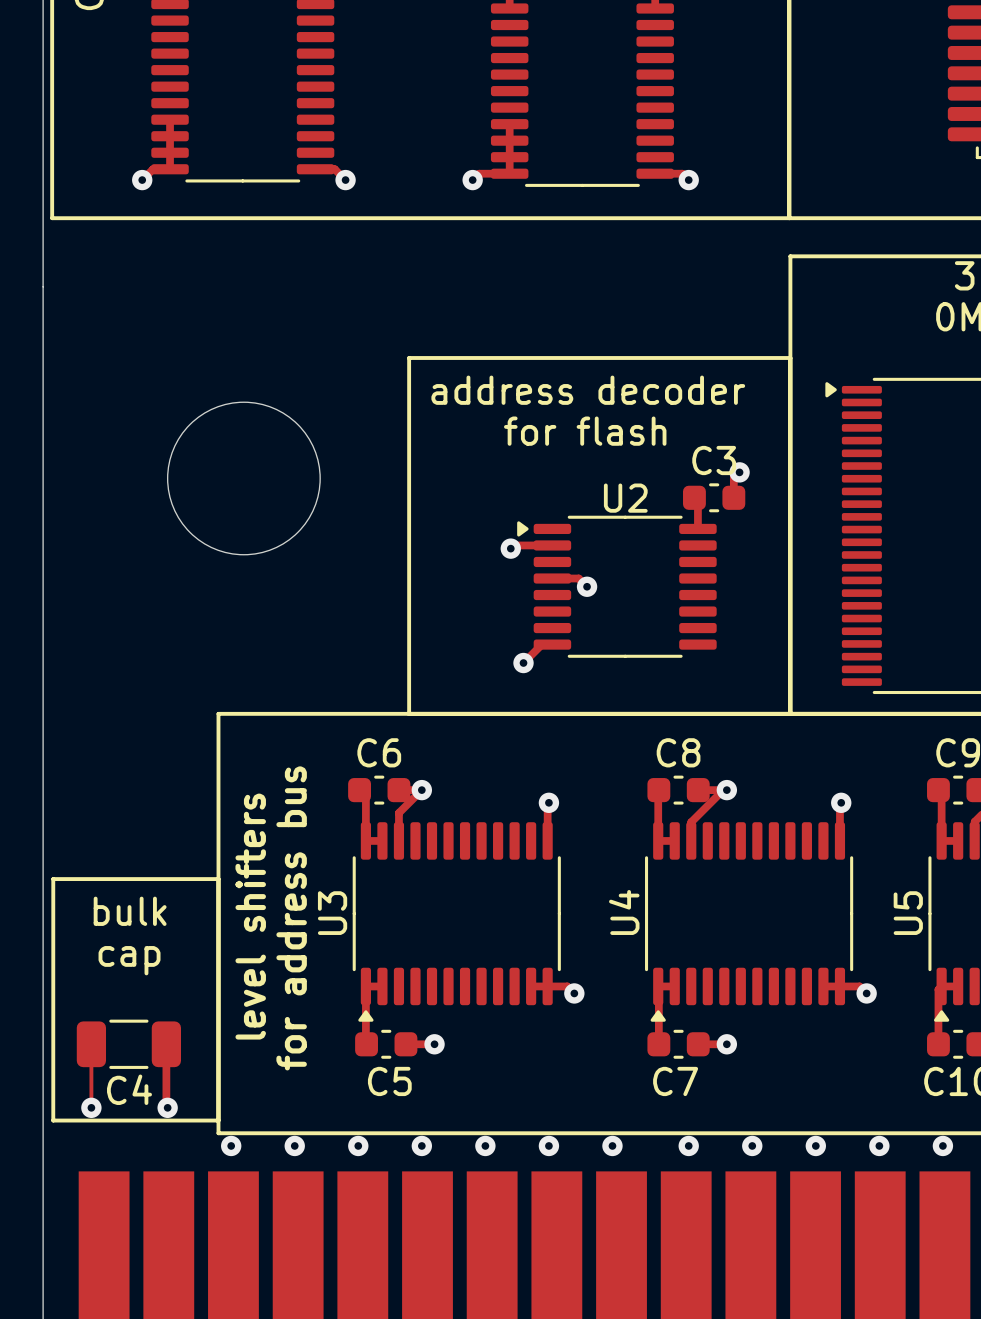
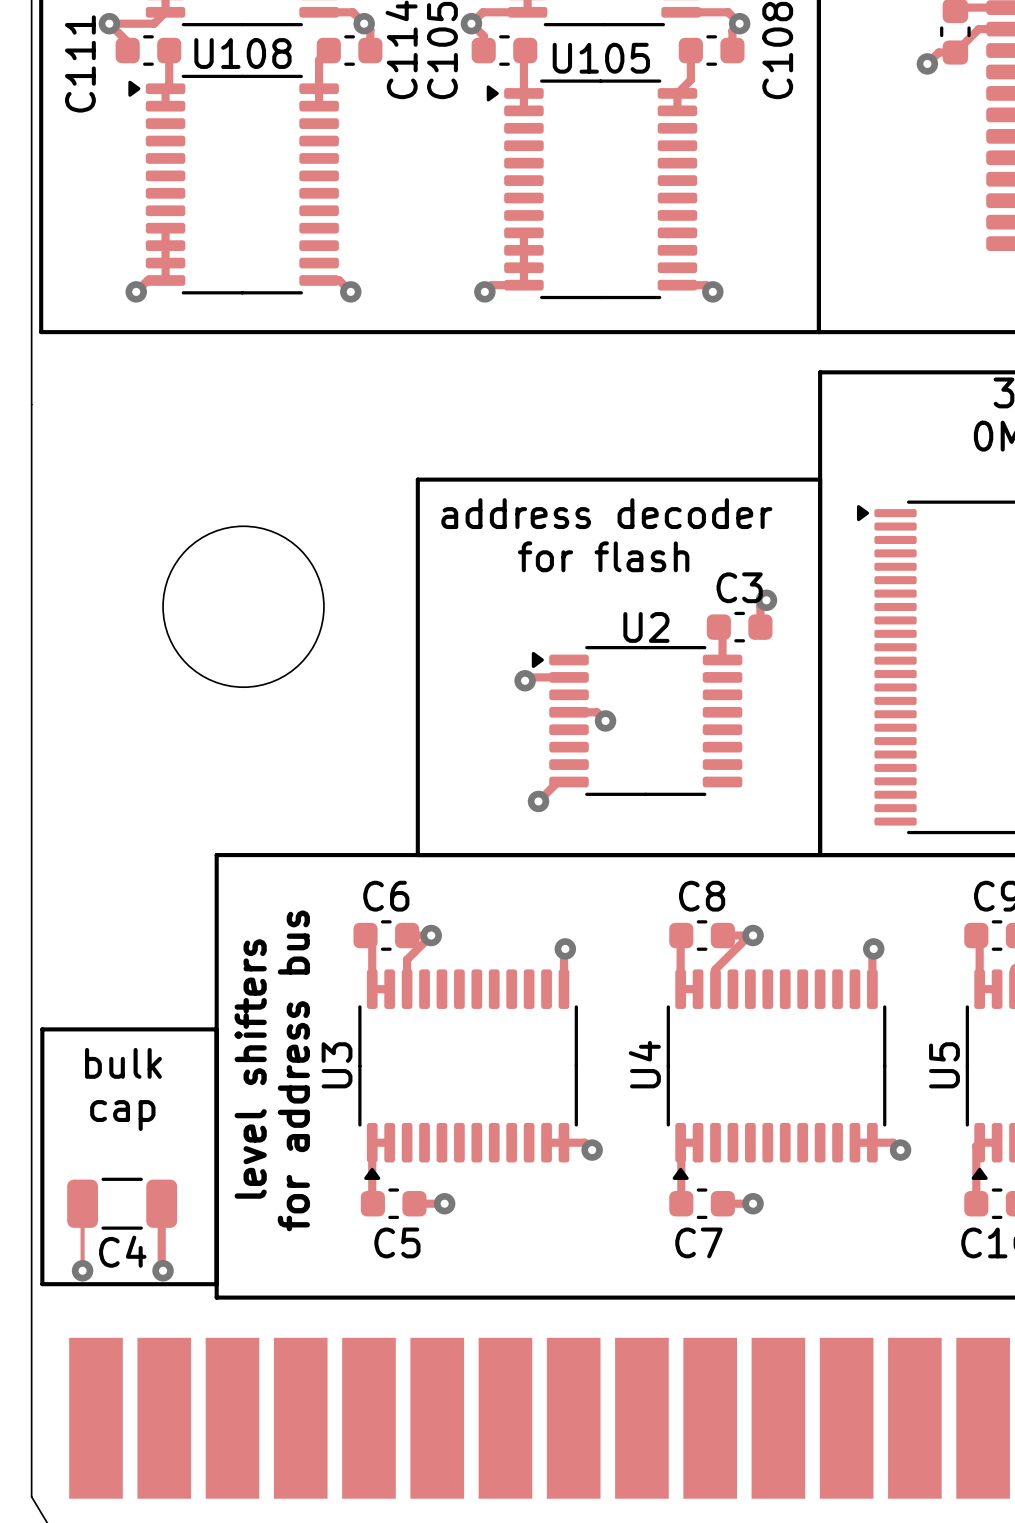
via: (231, 1145) -> none
via: (294, 1145) -> none
via: (358, 1145) -> none
via: (421, 1145) -> none
via: (485, 1145) -> none
via: (548, 1145) -> none
via: (612, 1145) -> none
via: (688, 1145) -> none
via: (752, 1145) -> none
via: (815, 1145) -> none
via: (879, 1145) -> none
via: (942, 1145) -> none

